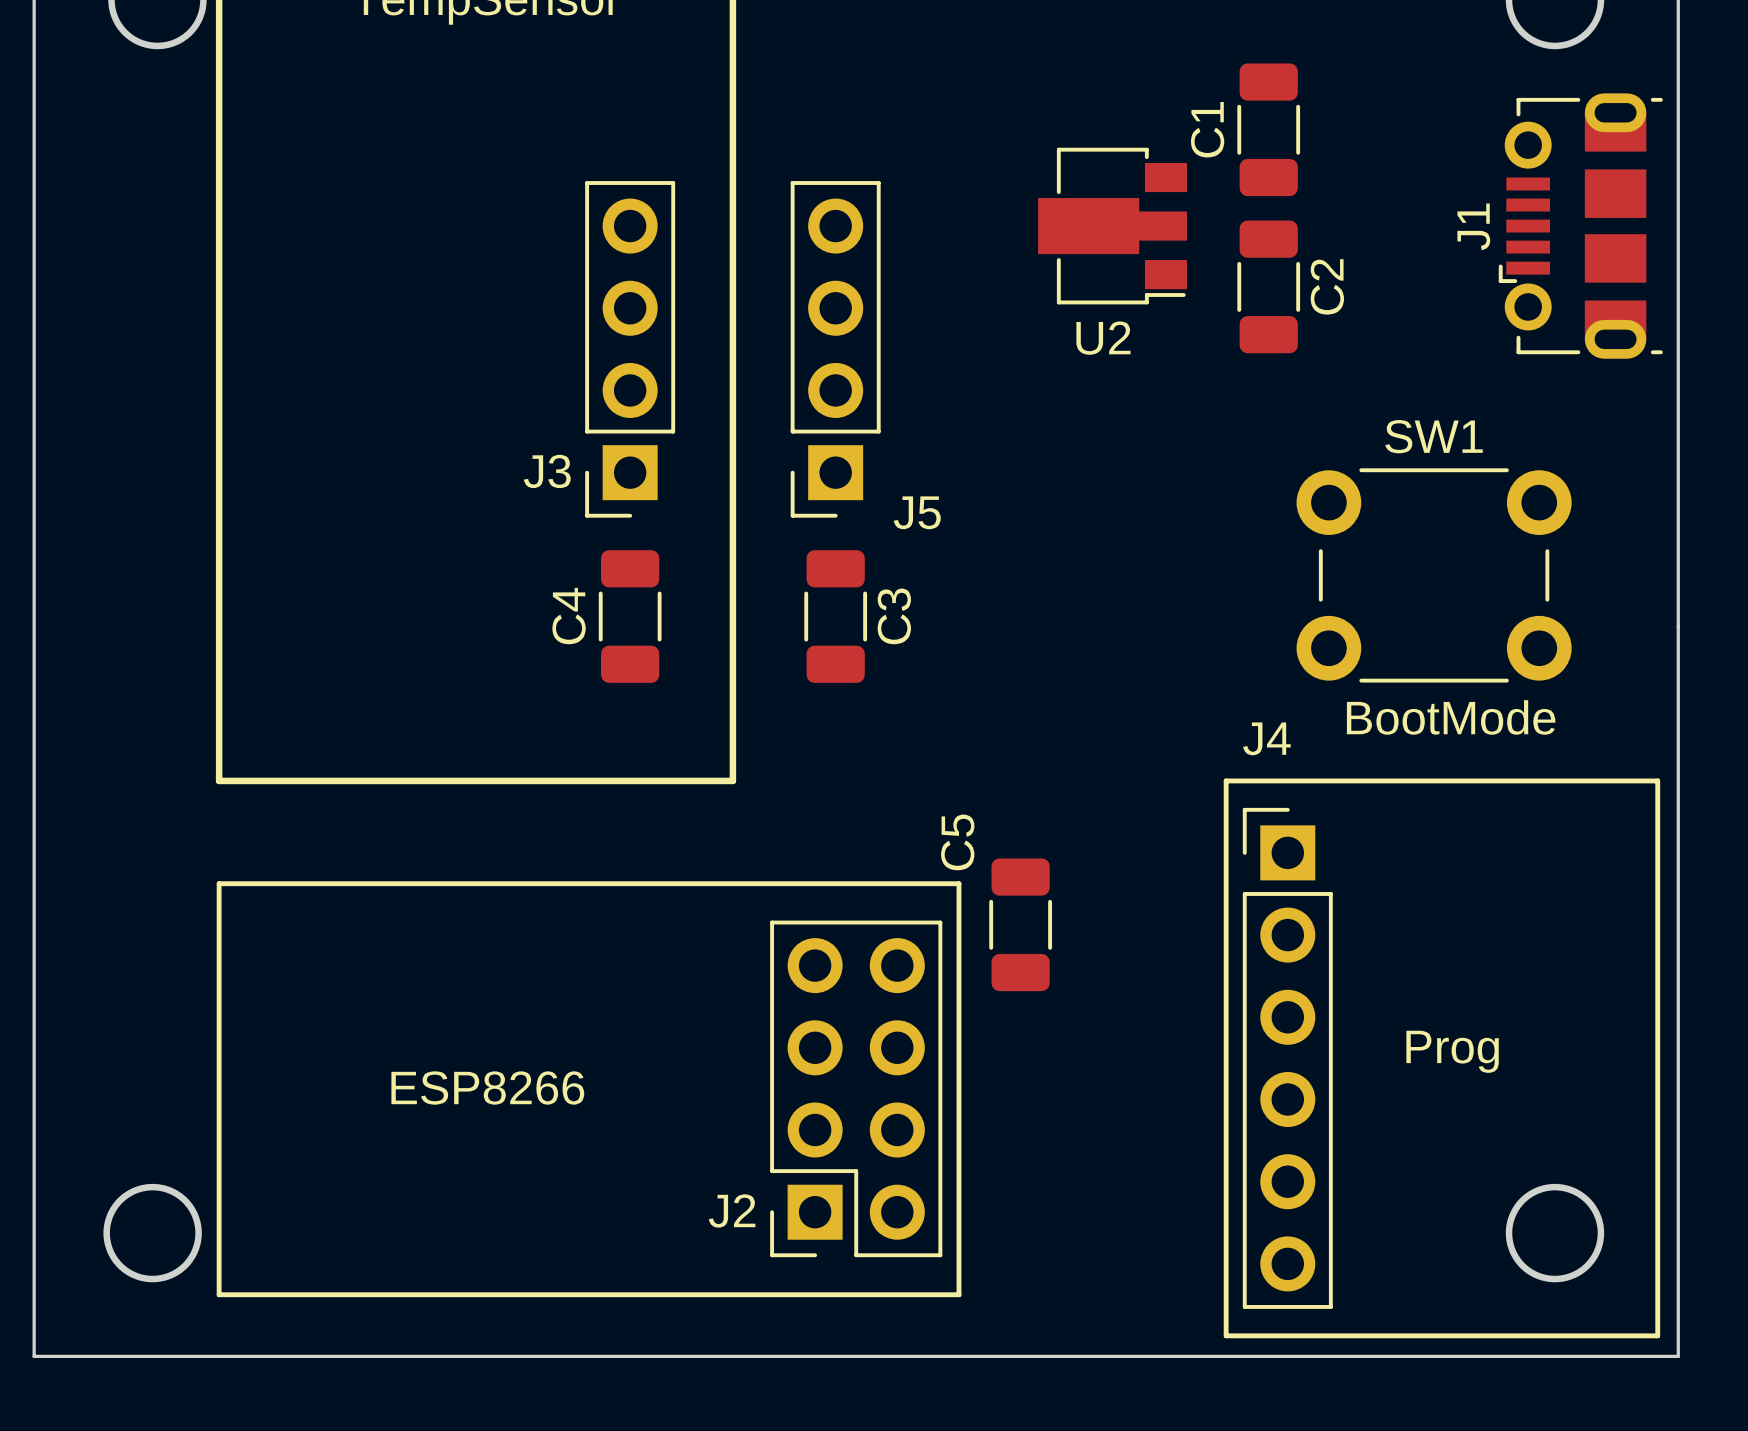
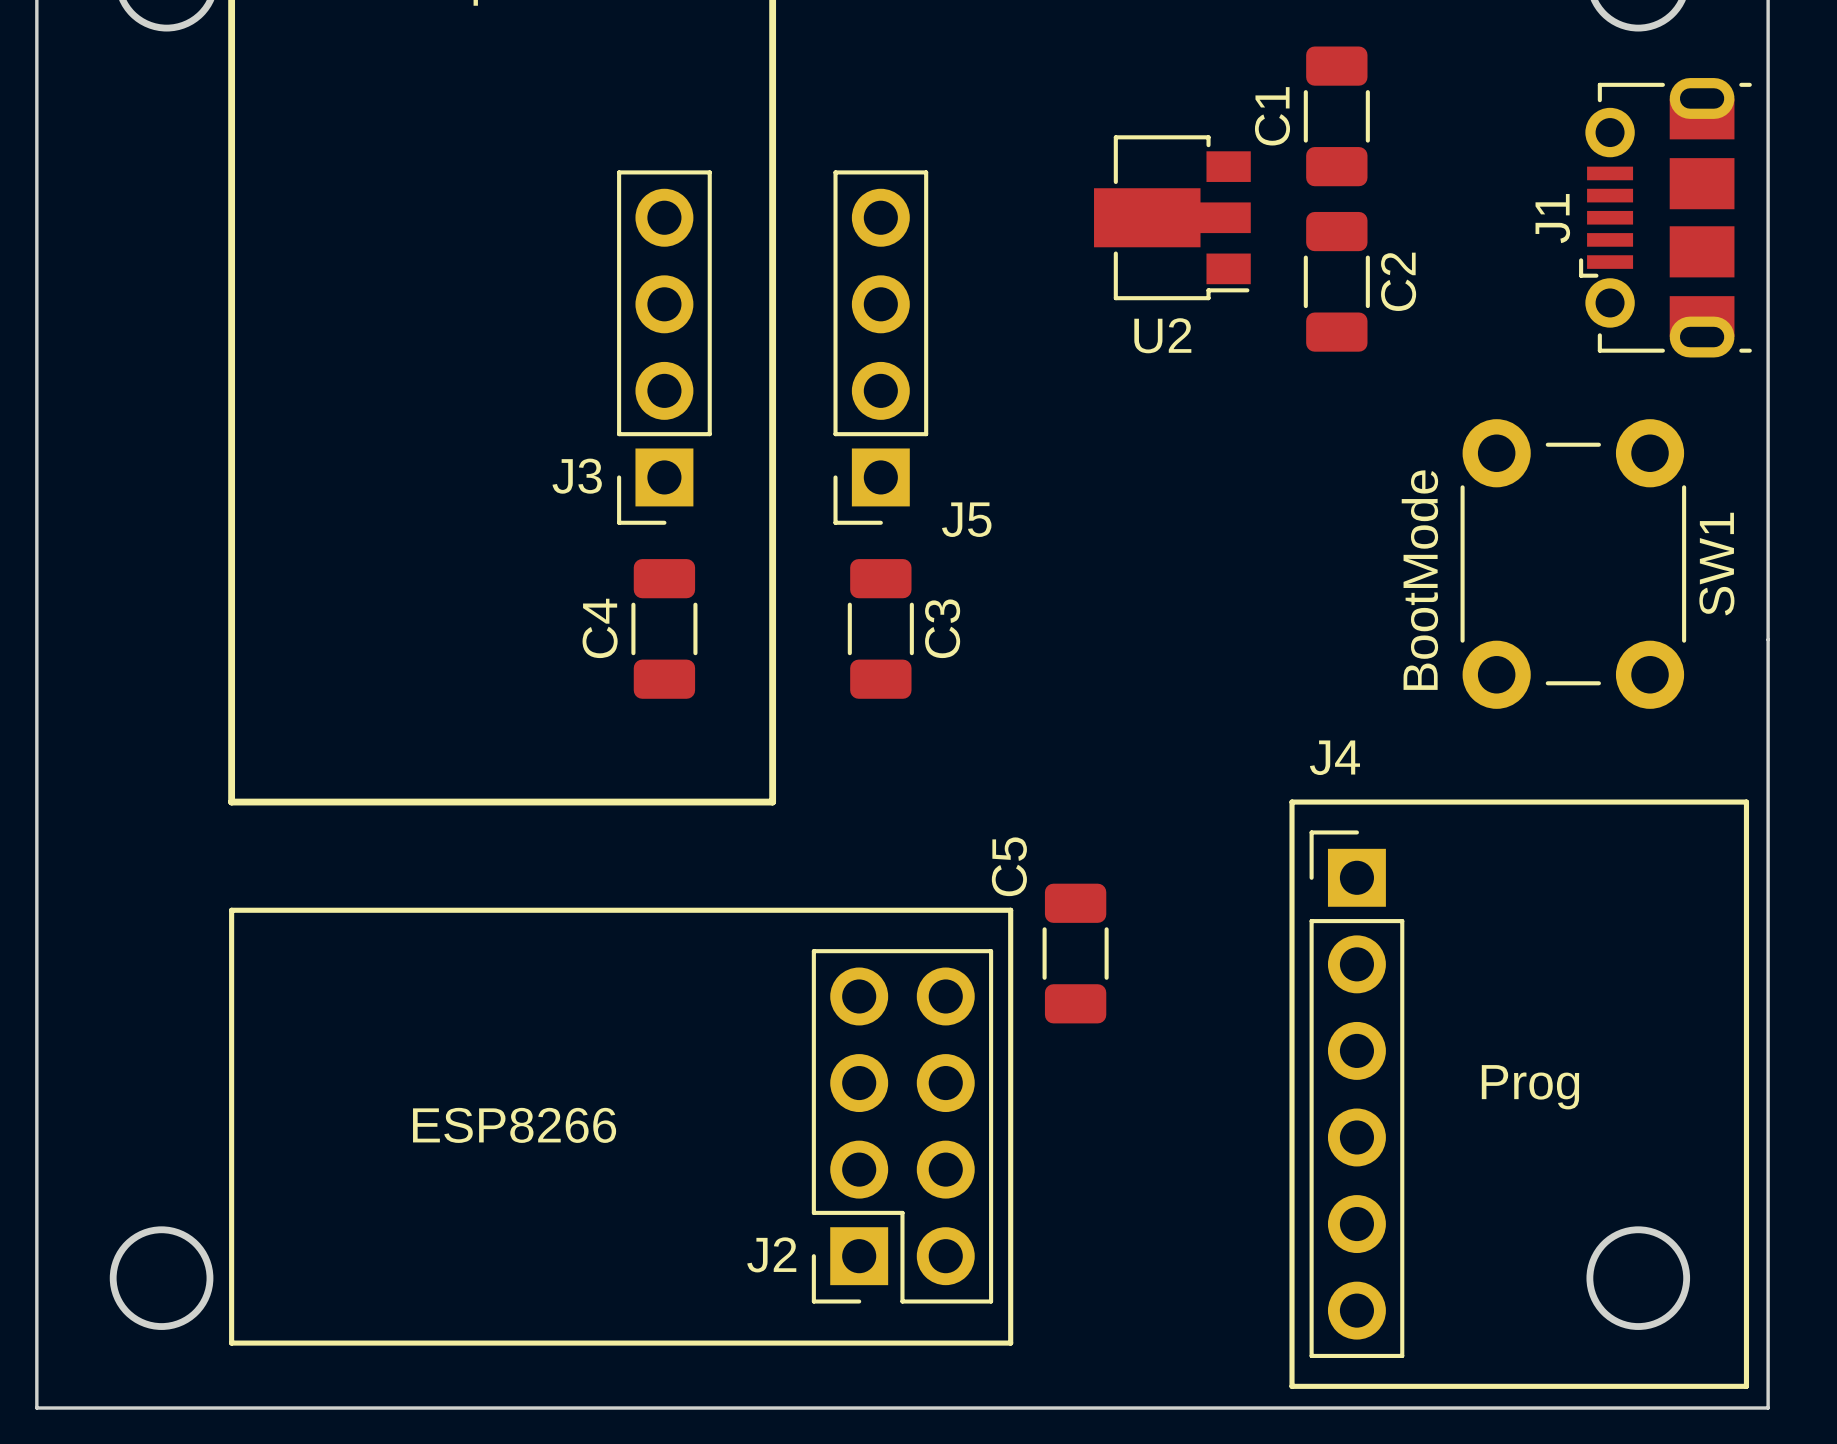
SW1 rotation: 0° (1434, 575) -> 90° clockwise (1573, 564)

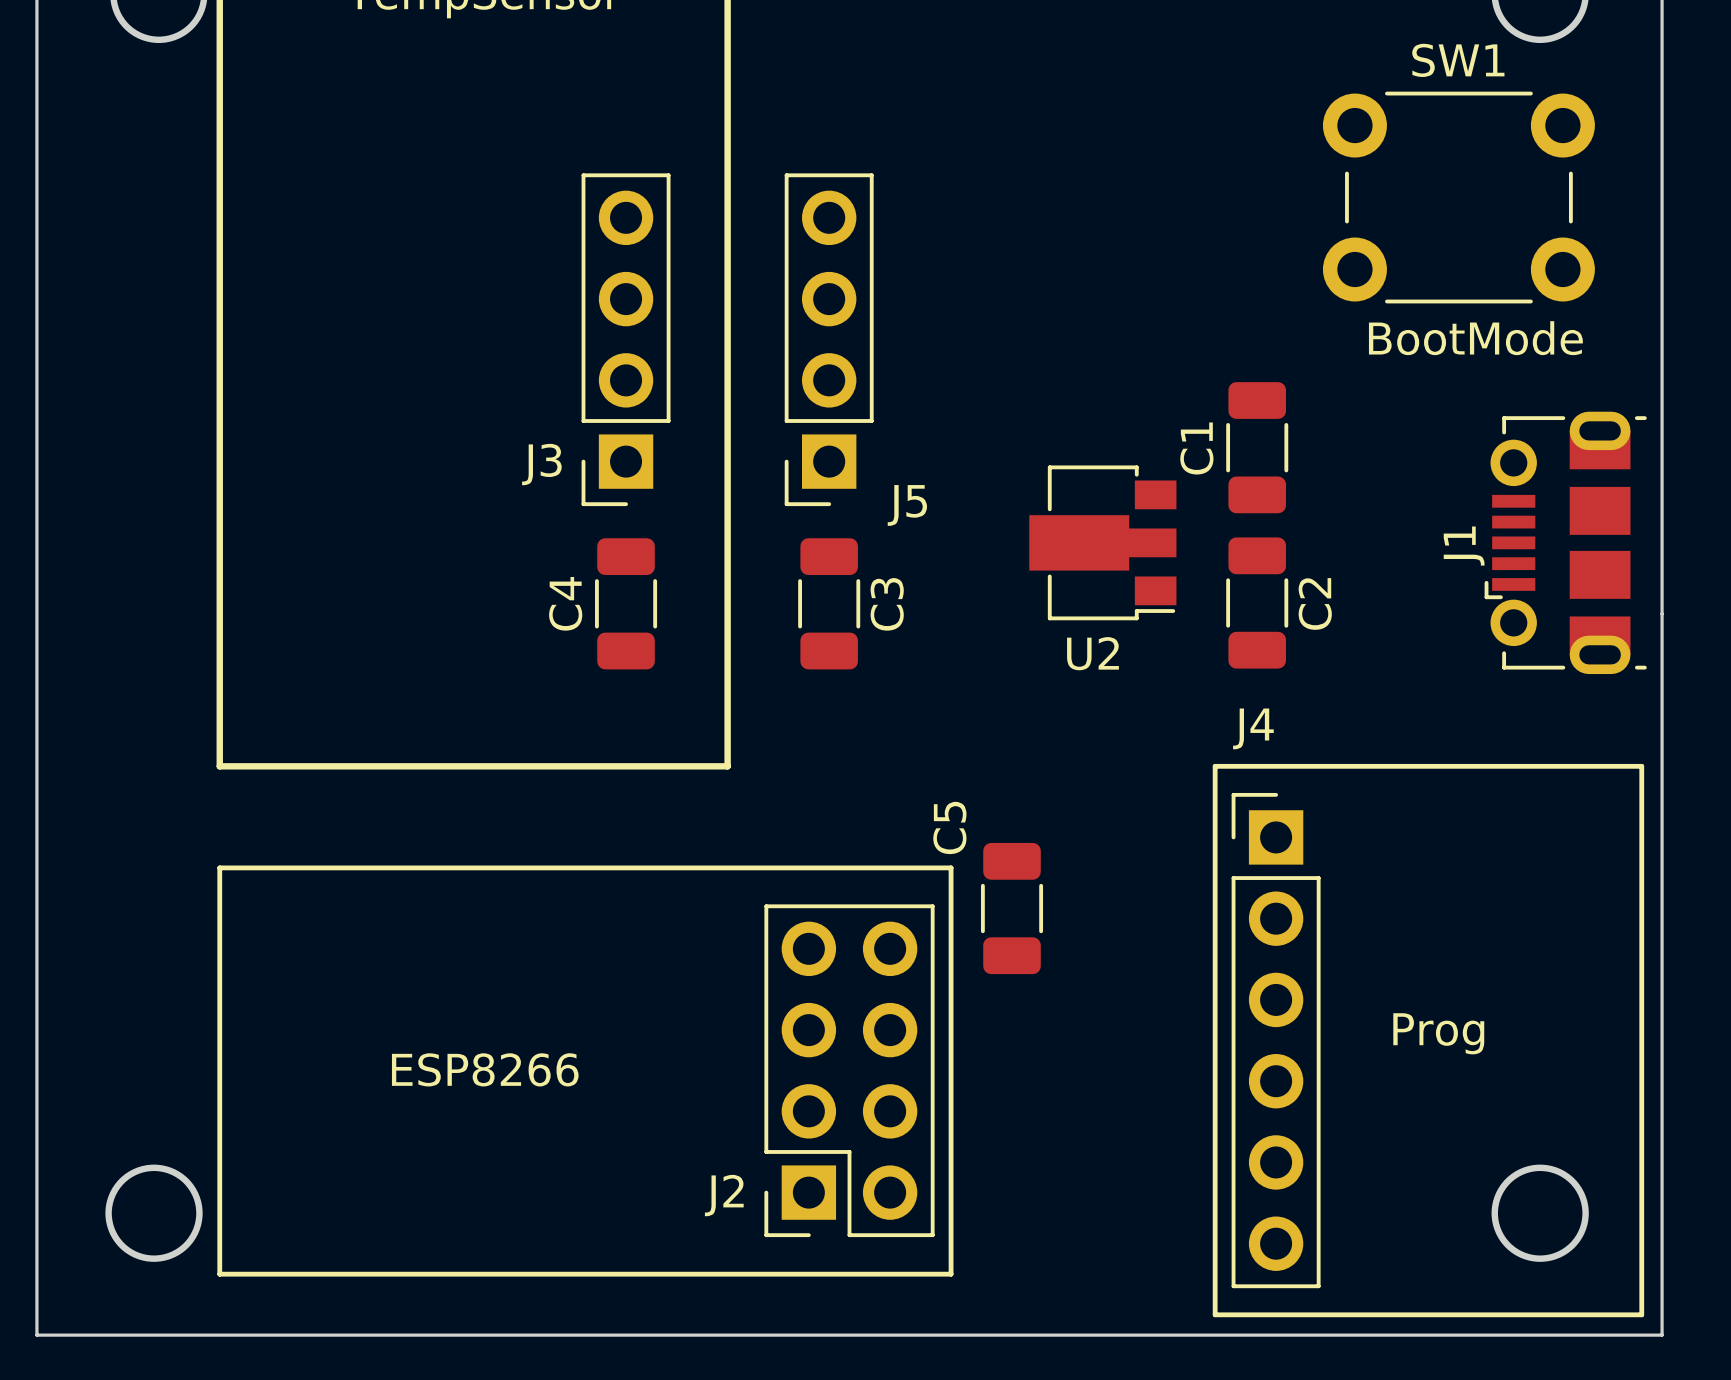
C1 position: (1336, 116) -> (1257, 447)
U2 position: (1172, 217) -> (1102, 542)
J1 position: (1665, 217) -> (1565, 542)
C2 position: (1336, 281) -> (1257, 603)
SW1 rotation: 0° (1573, 564) -> 90° clockwise (1458, 197)
SW1 position: (1573, 564) -> (1458, 197)
SW1 name position: SW1 (1716, 564) -> SW1 (1458, 60)
SW1 value position: BootMode (1419, 580) -> BootMode (1475, 338)

